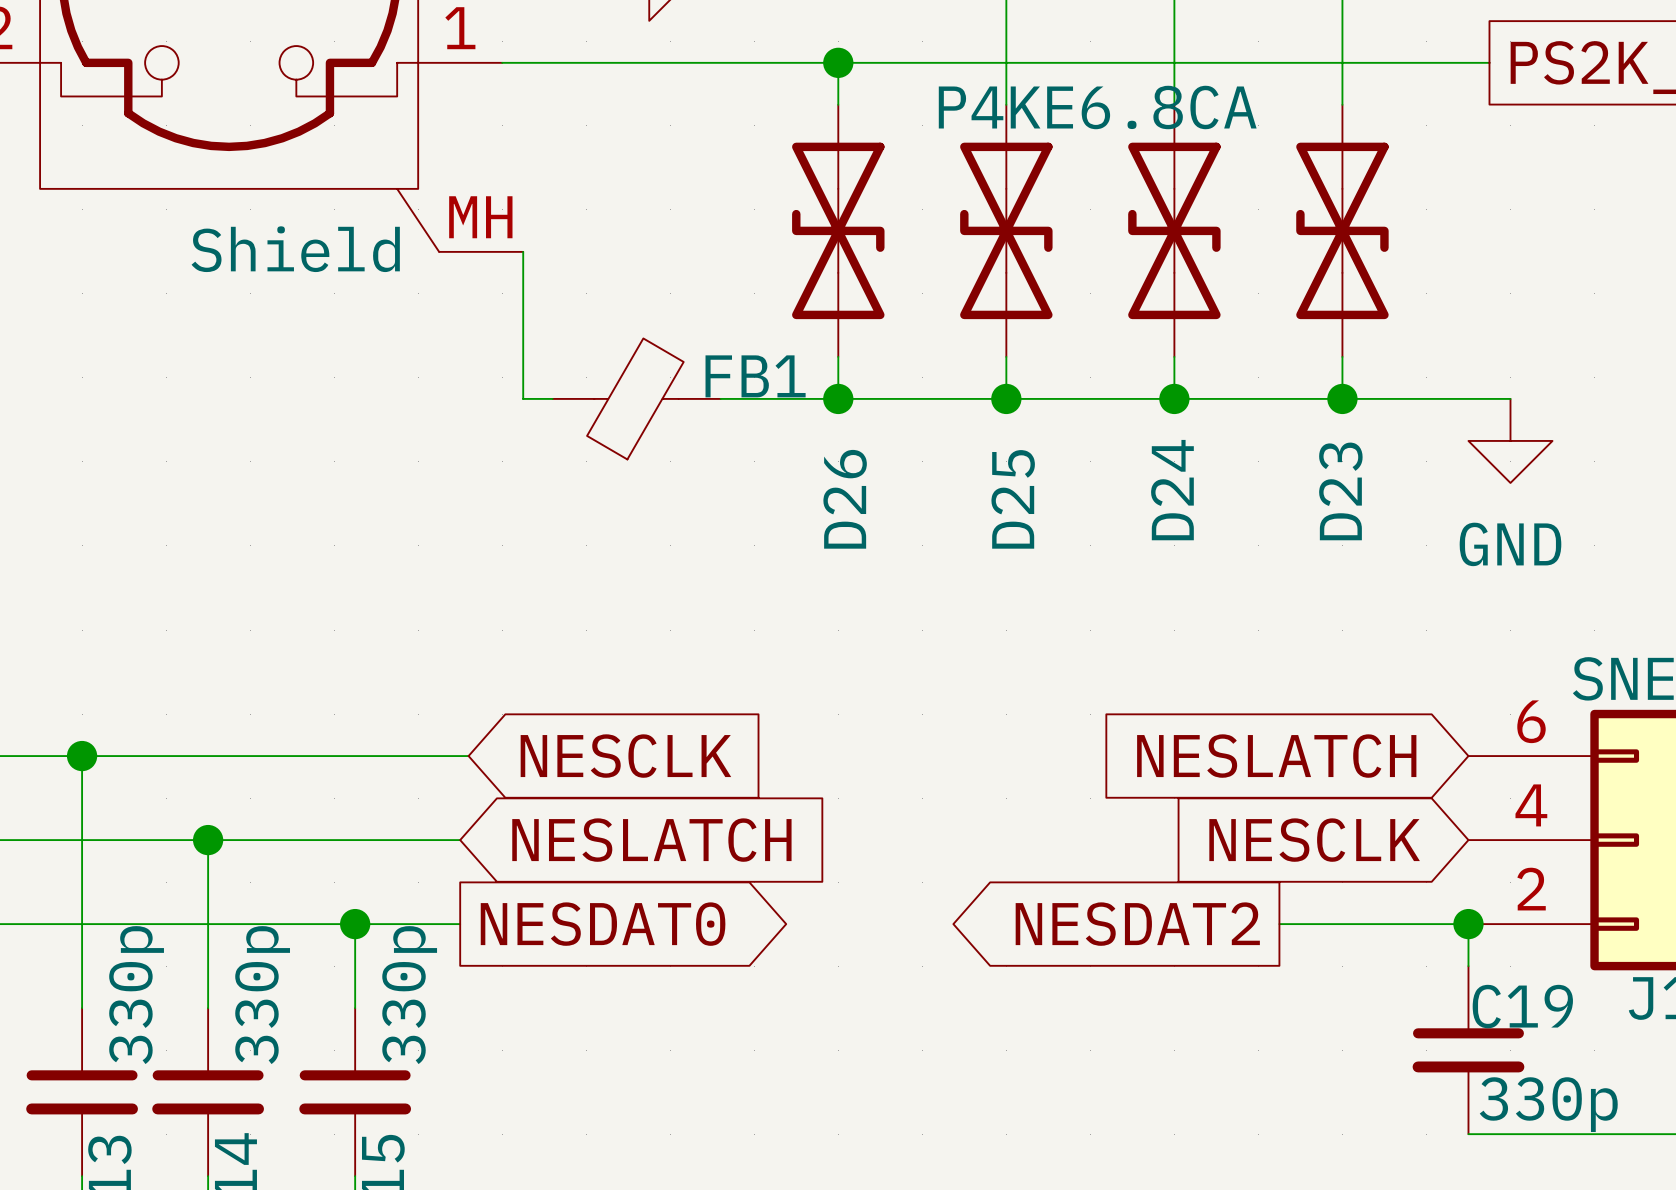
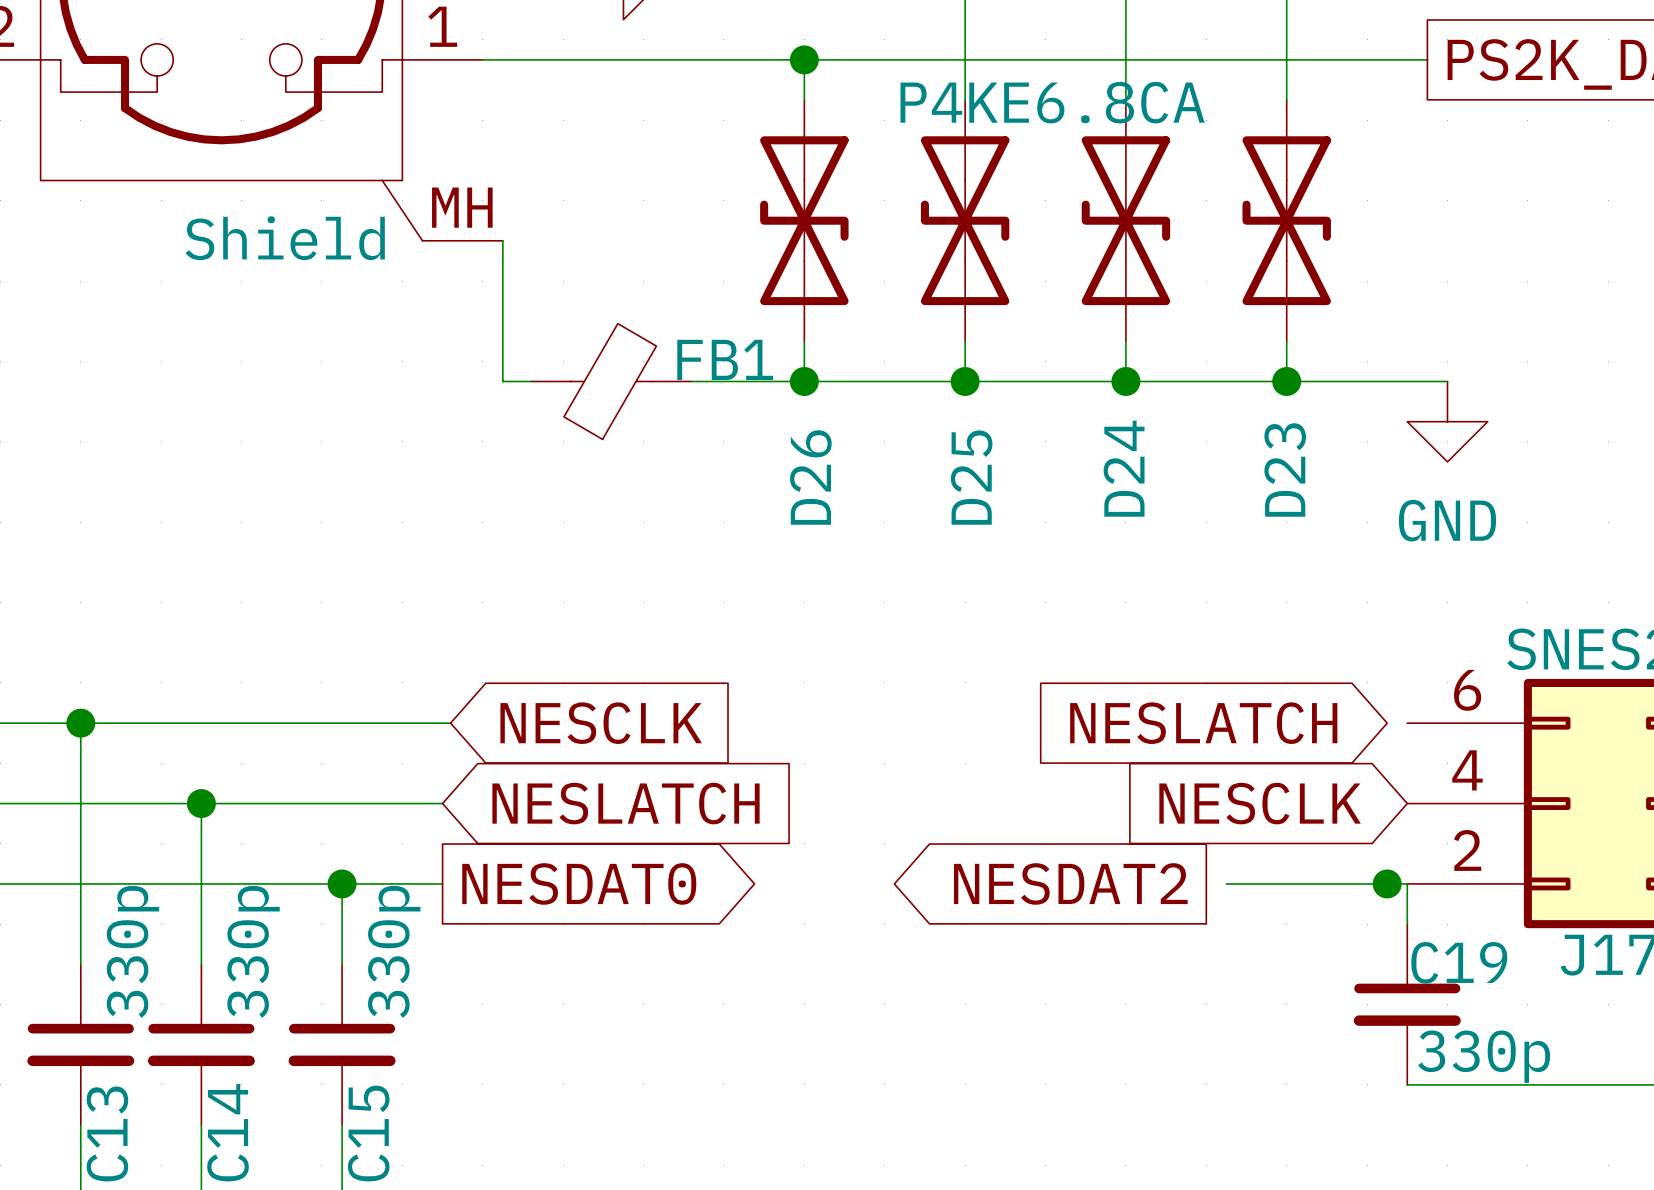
global label position: NESLATCH (1276, 756) -> NESLATCH (1203, 723)
global label position: NESDAT2 (1137, 924) -> NESDAT2 (1070, 883)
junction position: (1468, 924) -> (1387, 883)

